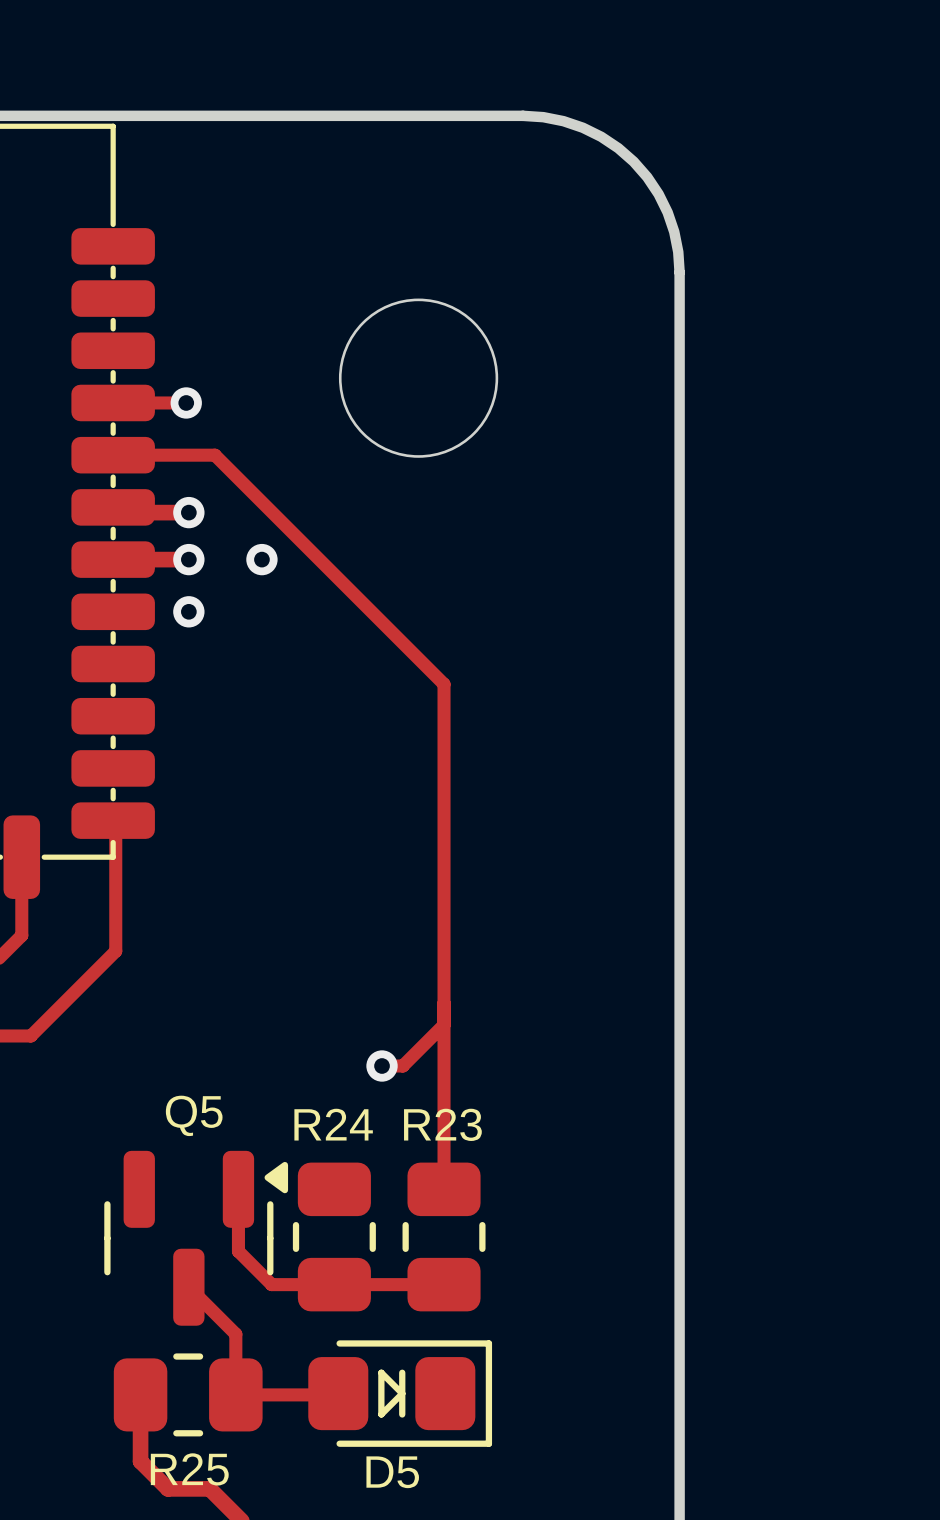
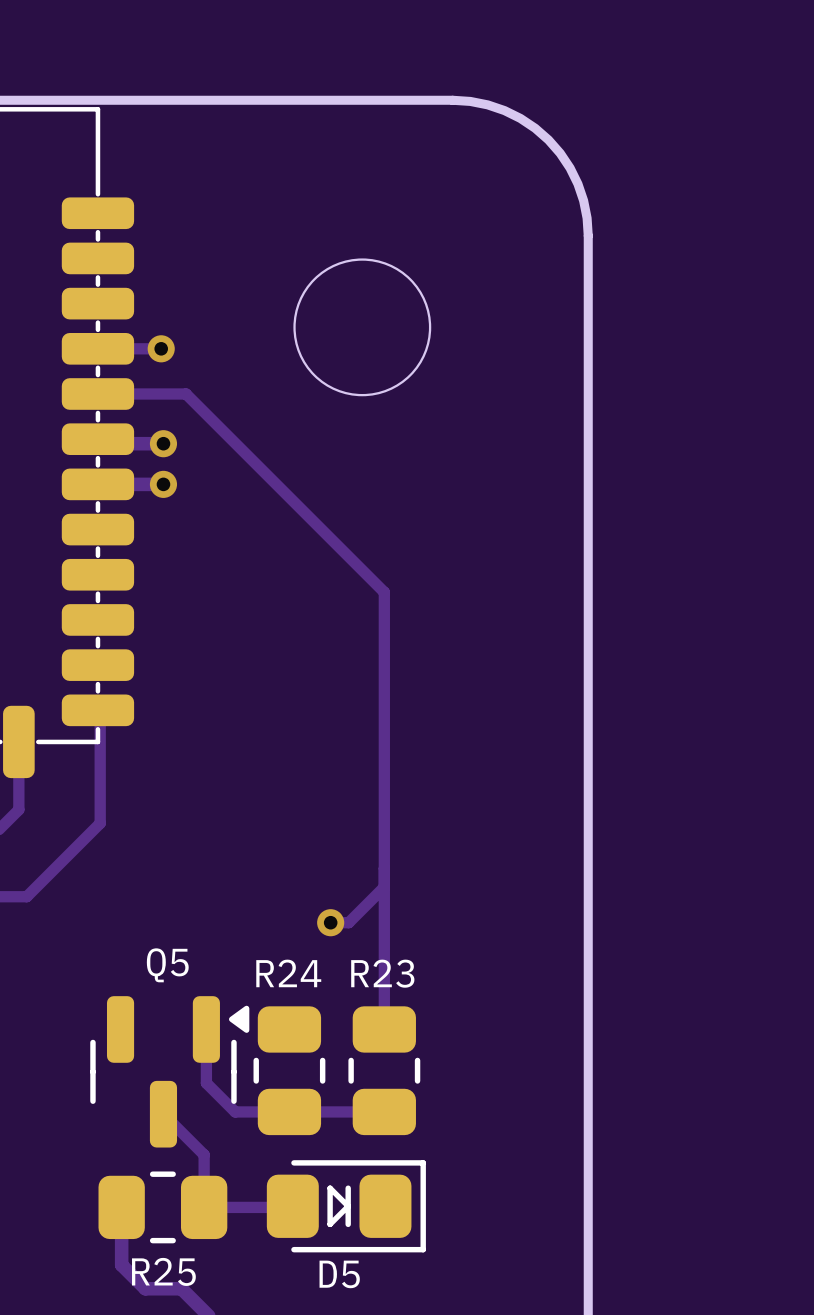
via: (261, 559) -> none
via: (188, 611) -> none

